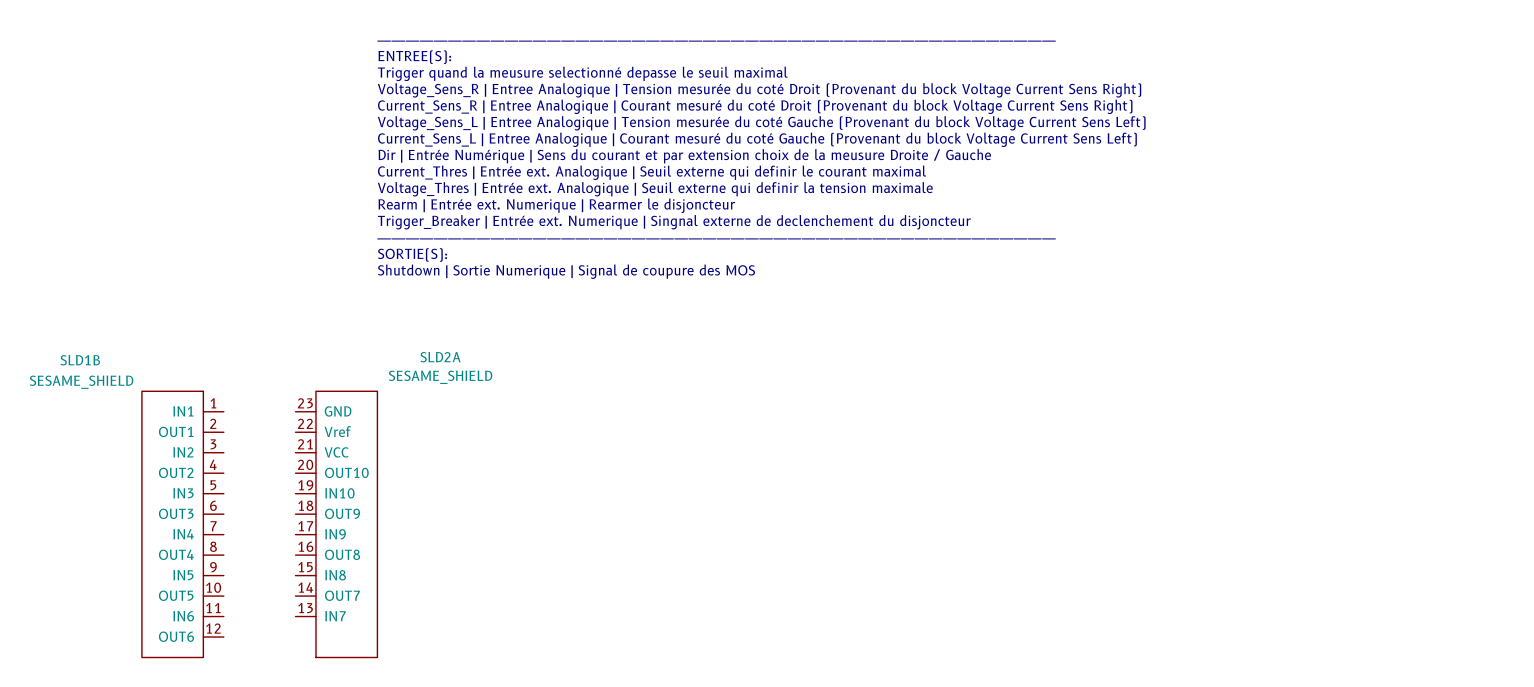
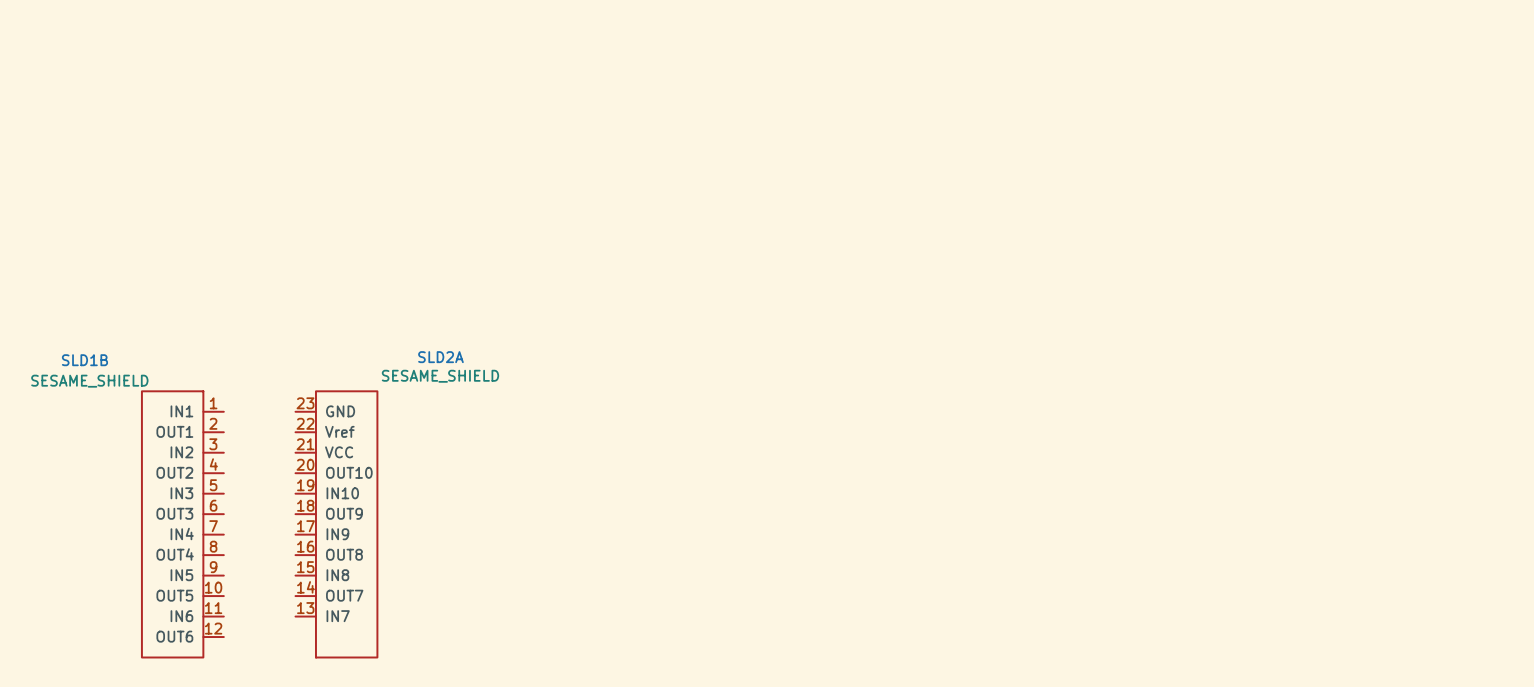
text: ———————————————————————————————————————————————— (716, 41) -> none
text: ENTREE(S): (414, 57) -> none
text: Trigger quand la meusure selectionné depasse le seuil maximal (582, 73) -> none
text: Voltage_Sens_R | Entree Analogique | Tension mesurée du coté Droit (Provenant du block Voltage Current Sens Right) (759, 90) -> none
text: Current_Sens_R | Entree Analogique | Courant mesuré du coté Droit (Provenant du block Voltage Current Sens Right) (755, 106) -> none
text: Voltage_Sens_L | Entree Analogique | Tension mesurée du coté Gauche (Provenant du block Voltage Current Sens Left) (761, 123) -> none
text: Current_Sens_L | Entree Analogique | Courant mesuré du coté Gauche (Provenant du block Voltage Current Sens Left) (757, 139) -> none
text: Dir | Entrée Numérique | Sens du courant et par extension choix de la meusure Droite / Gauche (684, 156) -> none
text: Current_Thres | Entrée ext. Analogique | Seuil externe qui definir le courant maximal (652, 172) -> none
text: Voltage_Thres | Entrée ext. Analogique | Seuil externe qui definir la tension maximale (655, 189) -> none
text: Rearm | Entrée ext. Numerique | Rearmer le disjoncteur (556, 205) -> none
text: Trigger_Breaker | Entrée ext. Numerique | Singnal externe de declenchement du disjoncteur (674, 222) -> none
text: ———————————————————————————————————————————————— (716, 238) -> none
text: SORTIE(S): (412, 254) -> none
text: Shutdown | Sortie Numerique | Signal de coupure des MOS (566, 271) -> none

